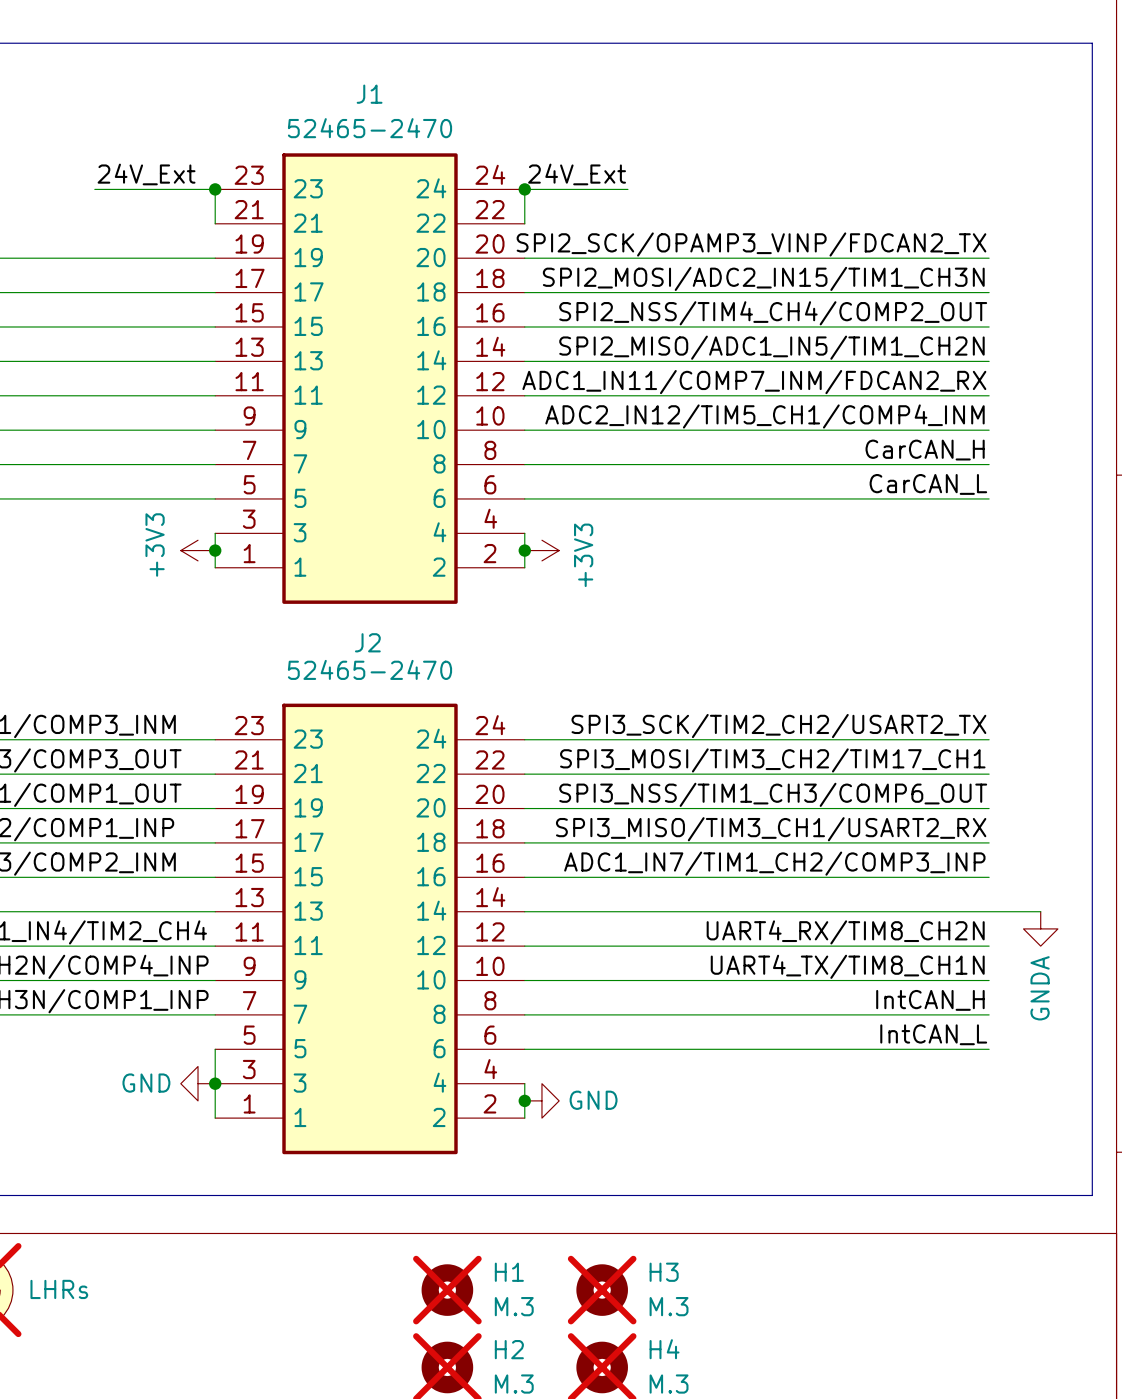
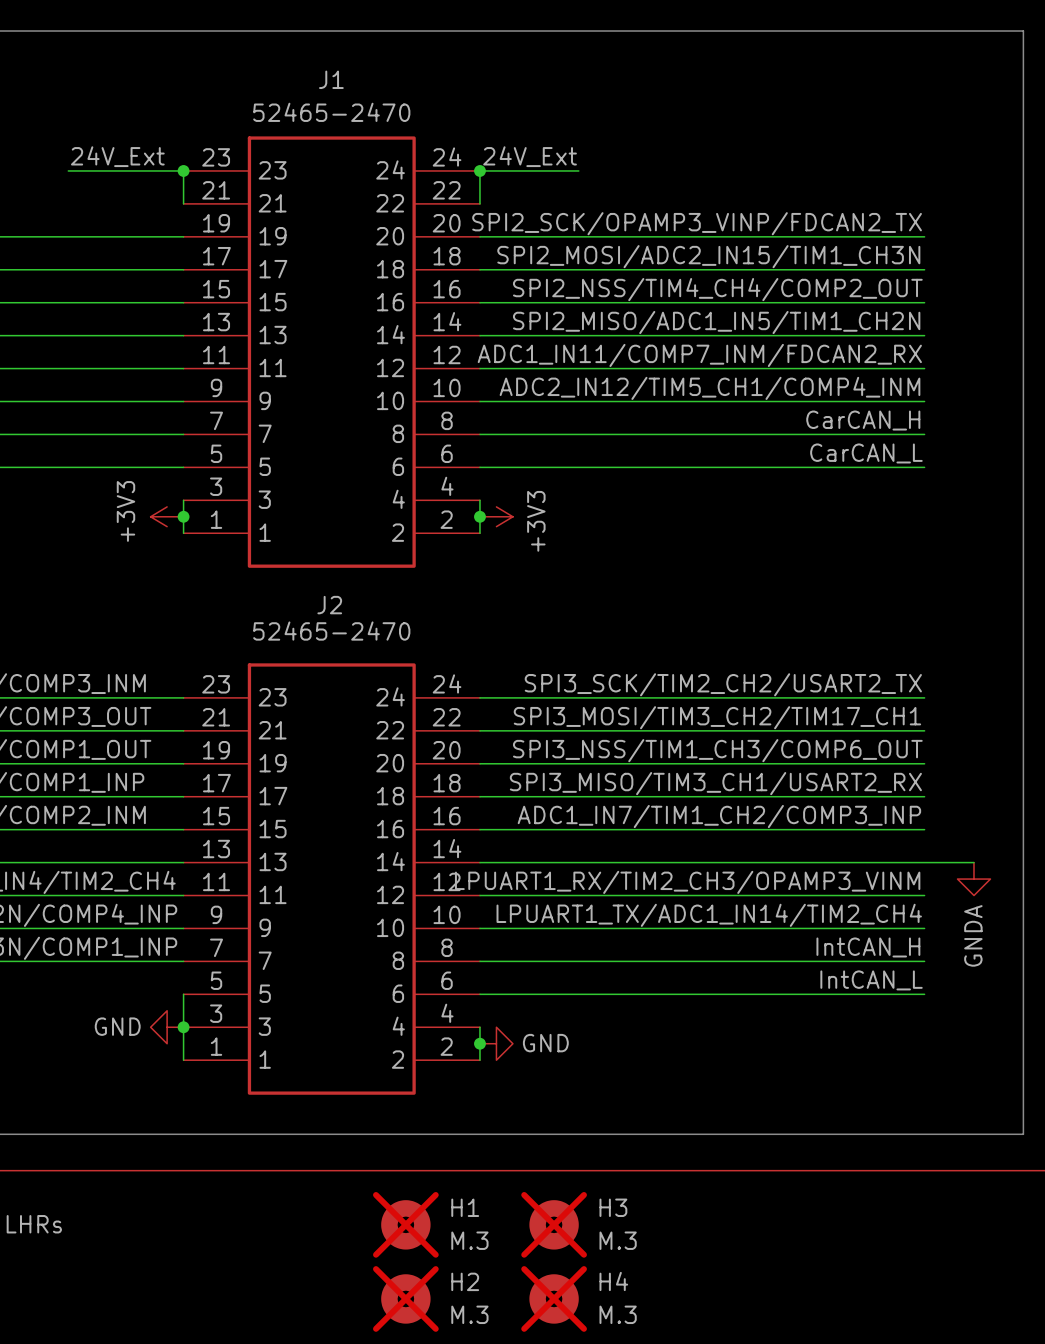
label: UART4_RX/TIM8_CH2N (845, 932) -> LPUART1_RX/TIM2_CH3/OPAMP3_VINM (687, 882)
label: UART4_TX/TIM8_CH1N (847, 966) -> LPUART1_TX/ADC1_IN14/TIM2_CH4 (709, 915)

